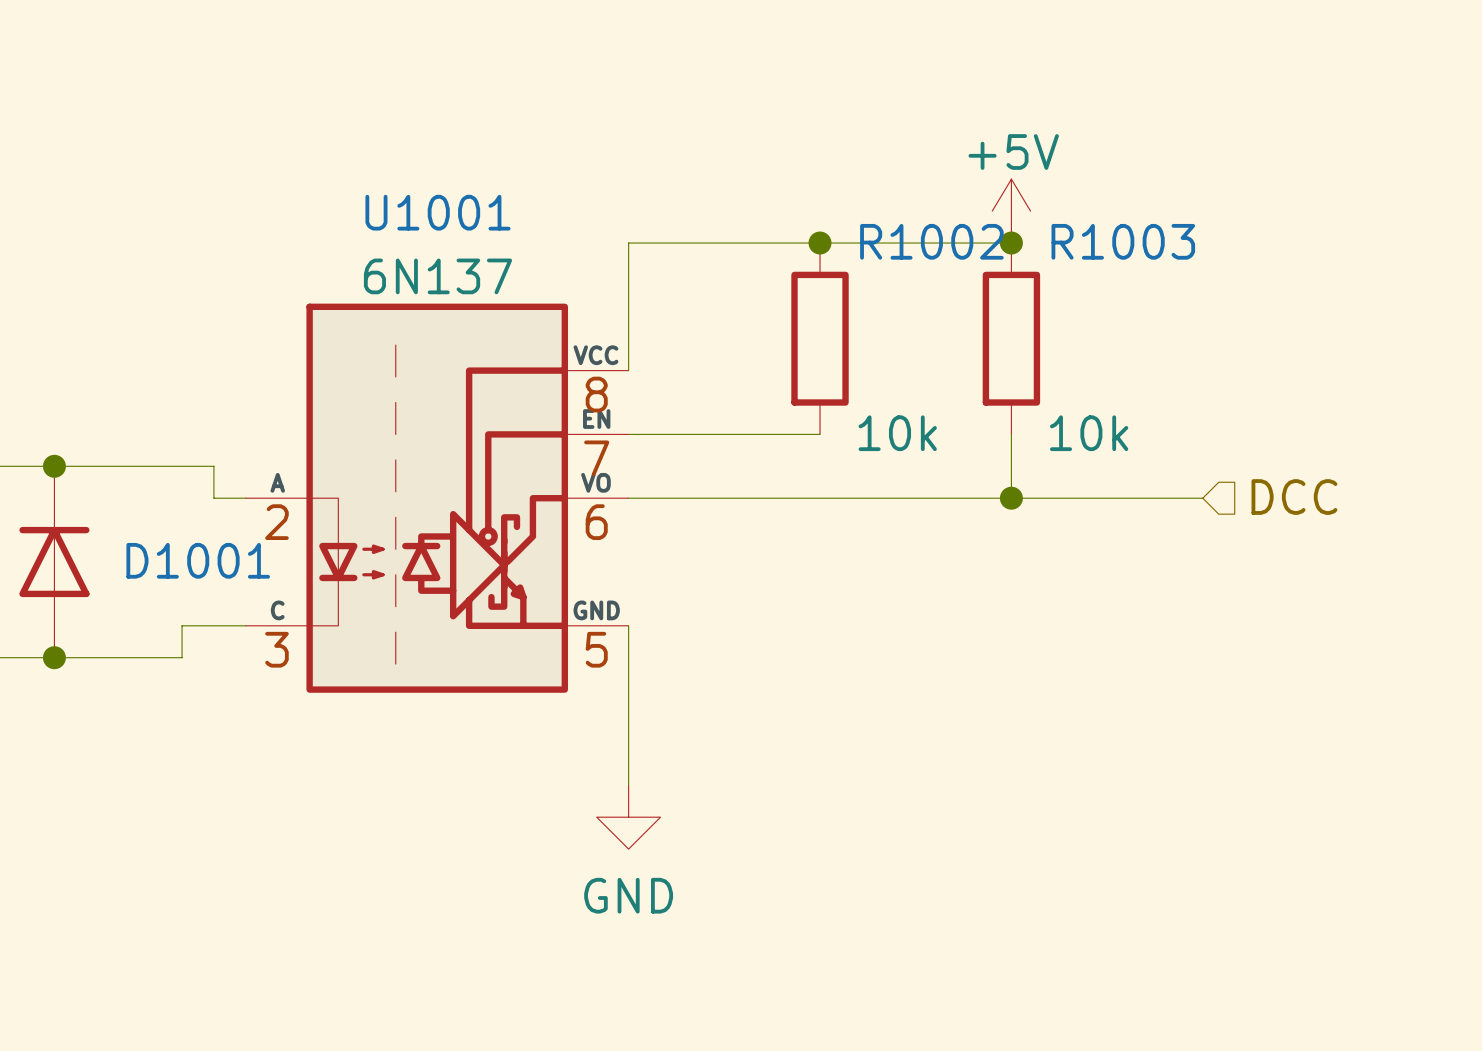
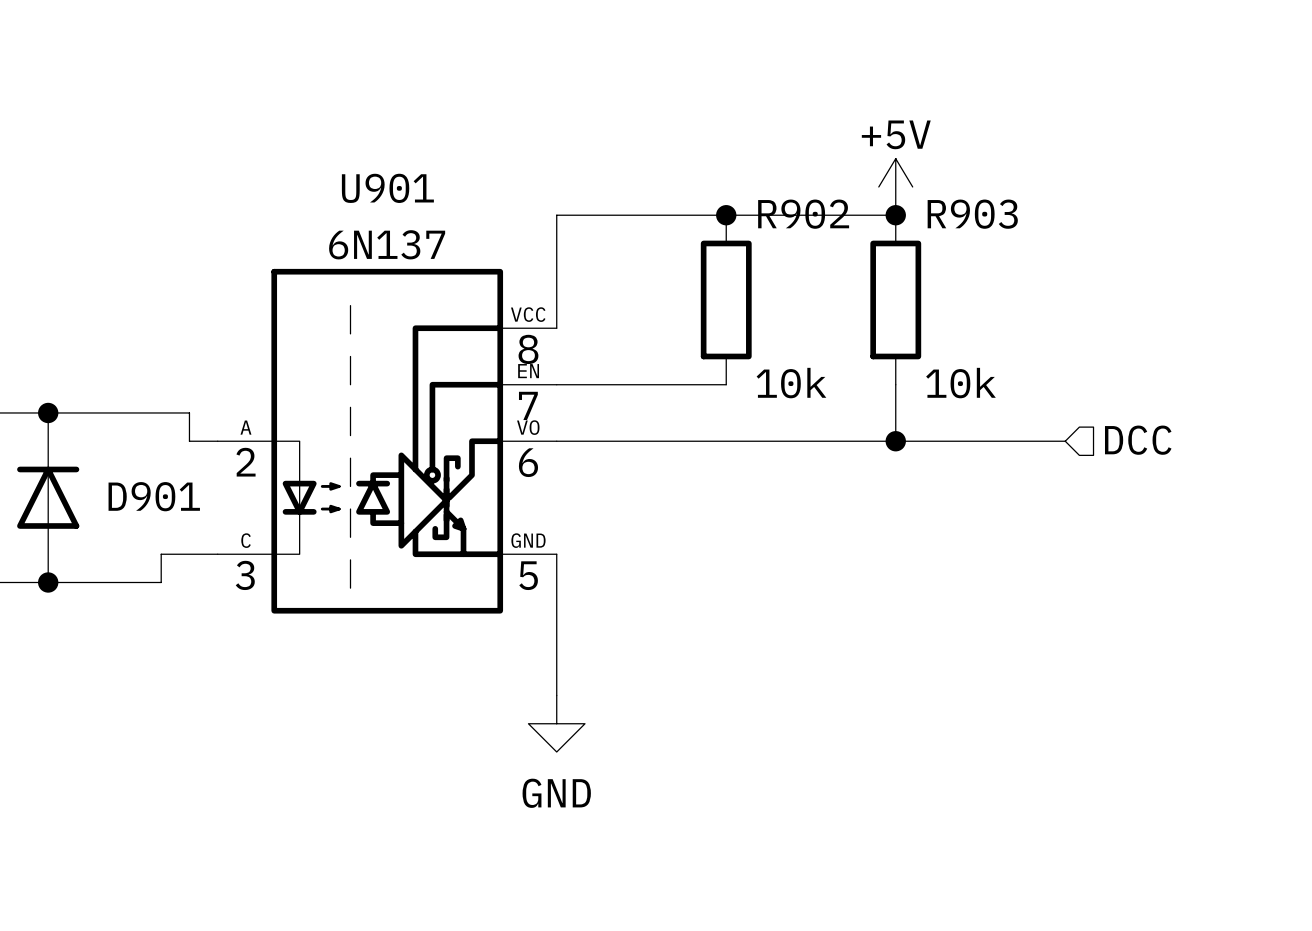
U1001 name: U1001 (437, 212) -> U901 (387, 188)
R1002 name: R1002 (931, 241) -> R902 (803, 214)
R1003 name: R1003 (1123, 241) -> R903 (972, 214)
D1001 name: D1001 (198, 560) -> D901 (154, 496)

